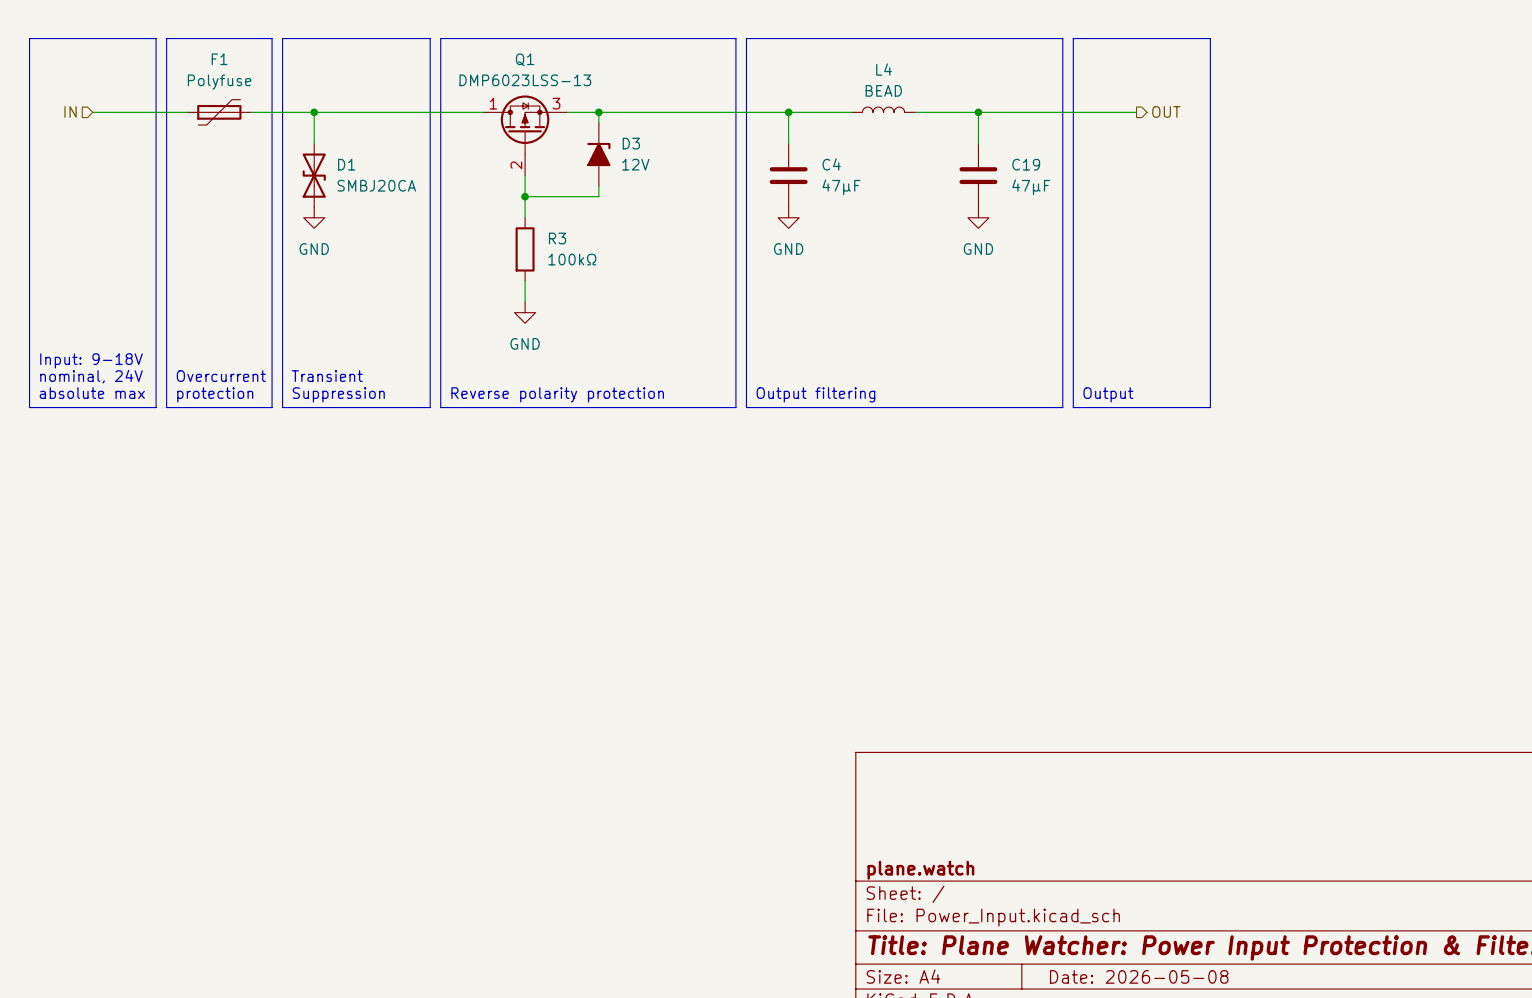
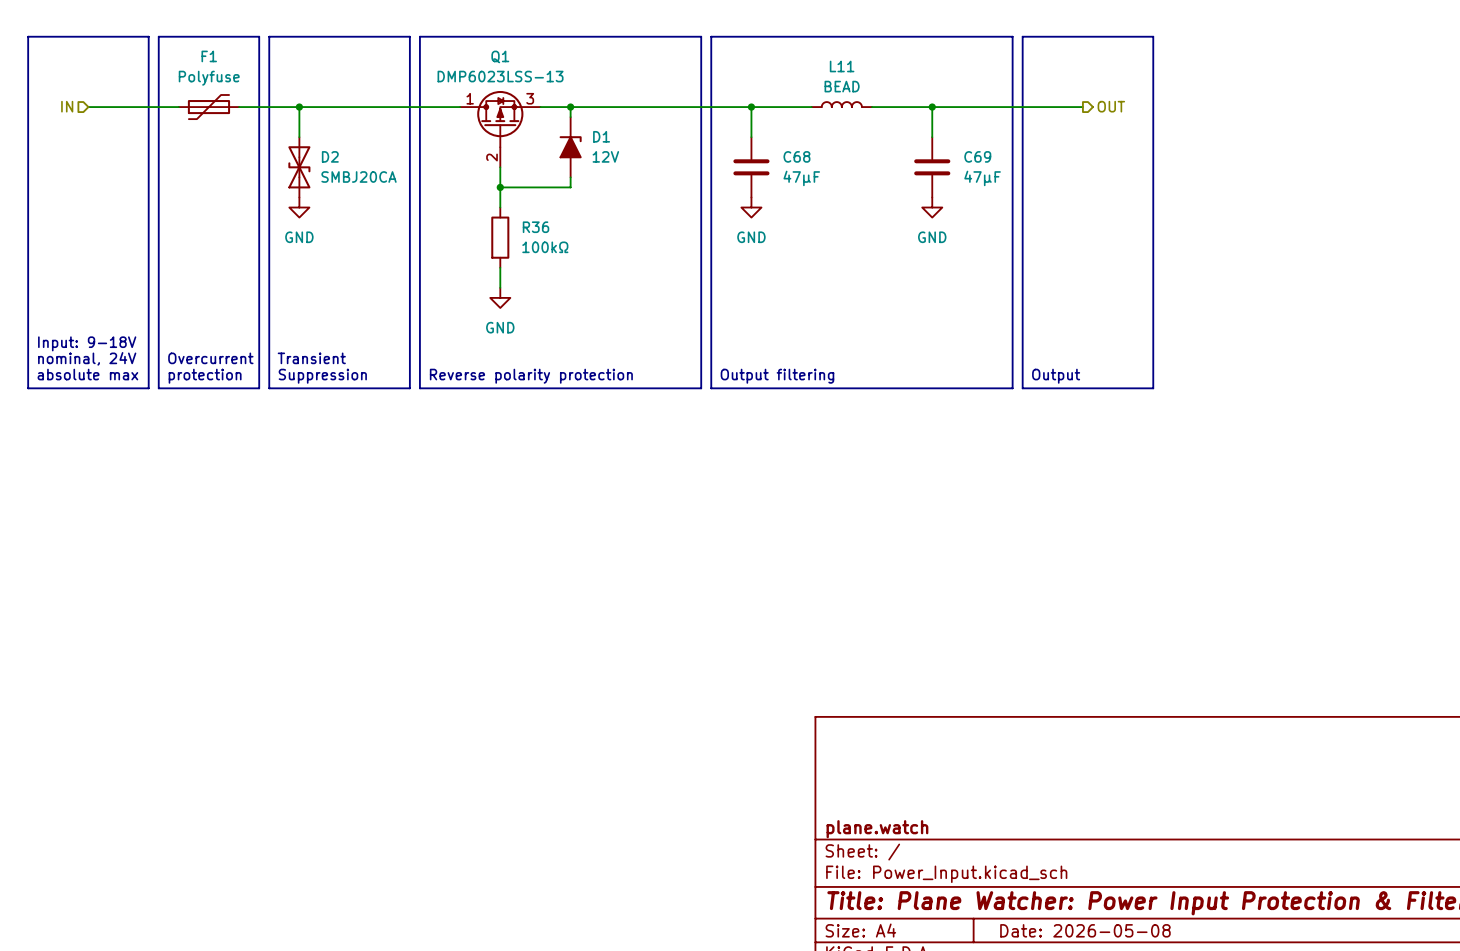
L4 name: L4 (884, 69) -> L11 (842, 66)
D3 name: D3 (631, 143) -> D1 (601, 136)
D1 name: D1 (346, 164) -> D2 (330, 156)
C4 name: C4 (831, 164) -> C68 (796, 156)
C19 name: C19 (1026, 164) -> C69 (977, 156)
R3 name: R3 (557, 238) -> R36 (536, 227)

